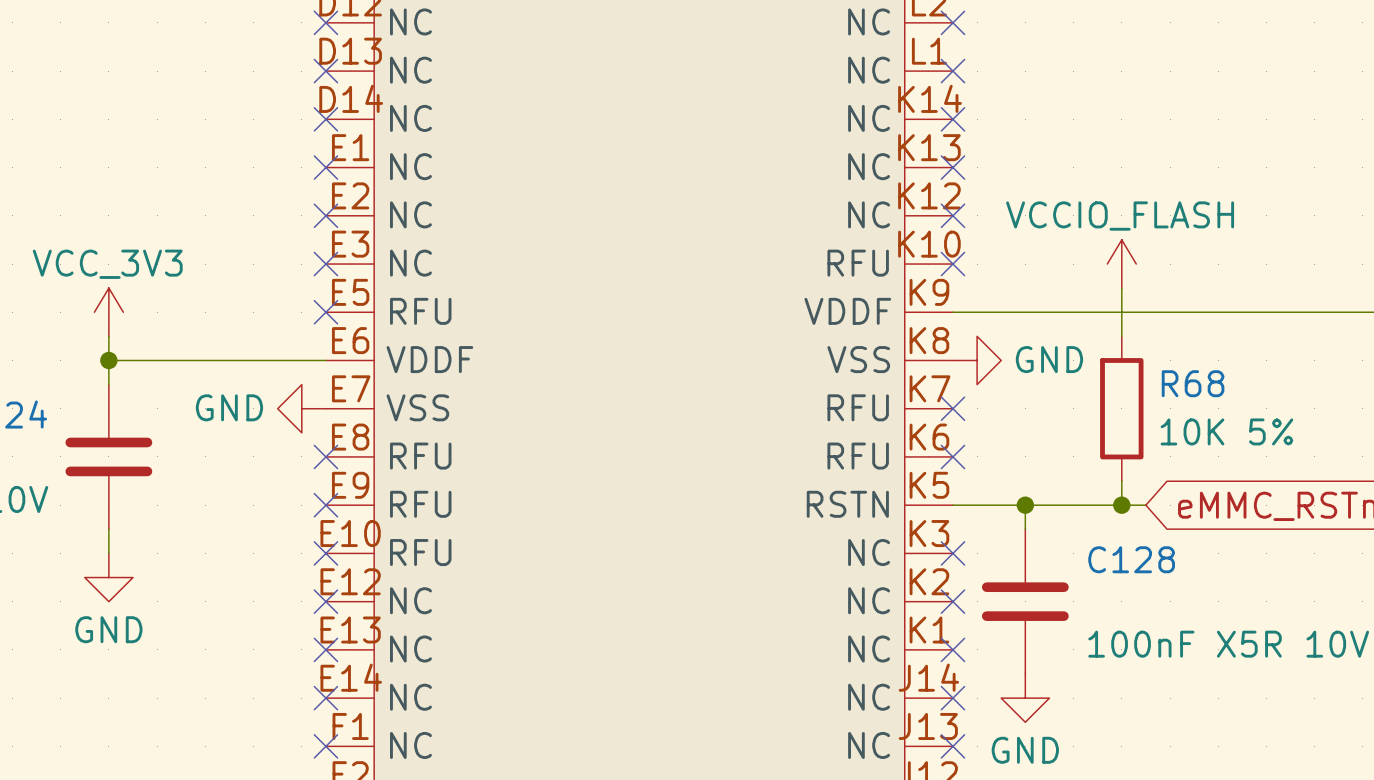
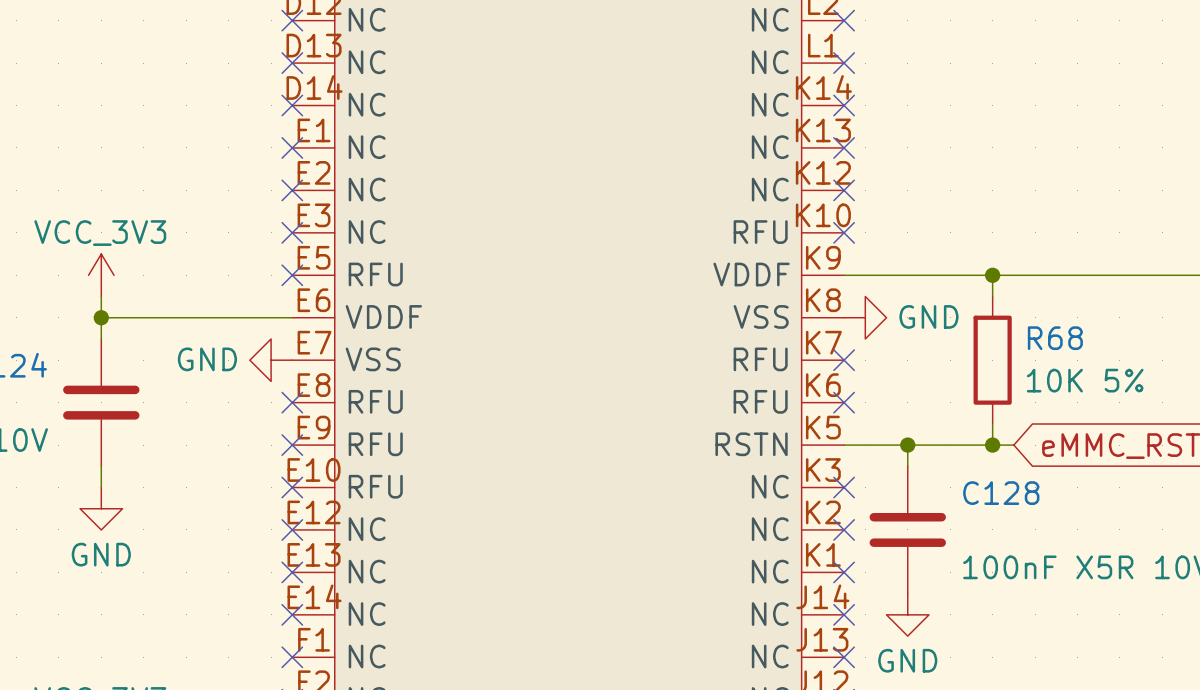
power symbol: VCCIO_FLASH (1121, 264) -> none
wire: (1121, 288) (1121, 312) -> none
junction: none -> (992, 275)

